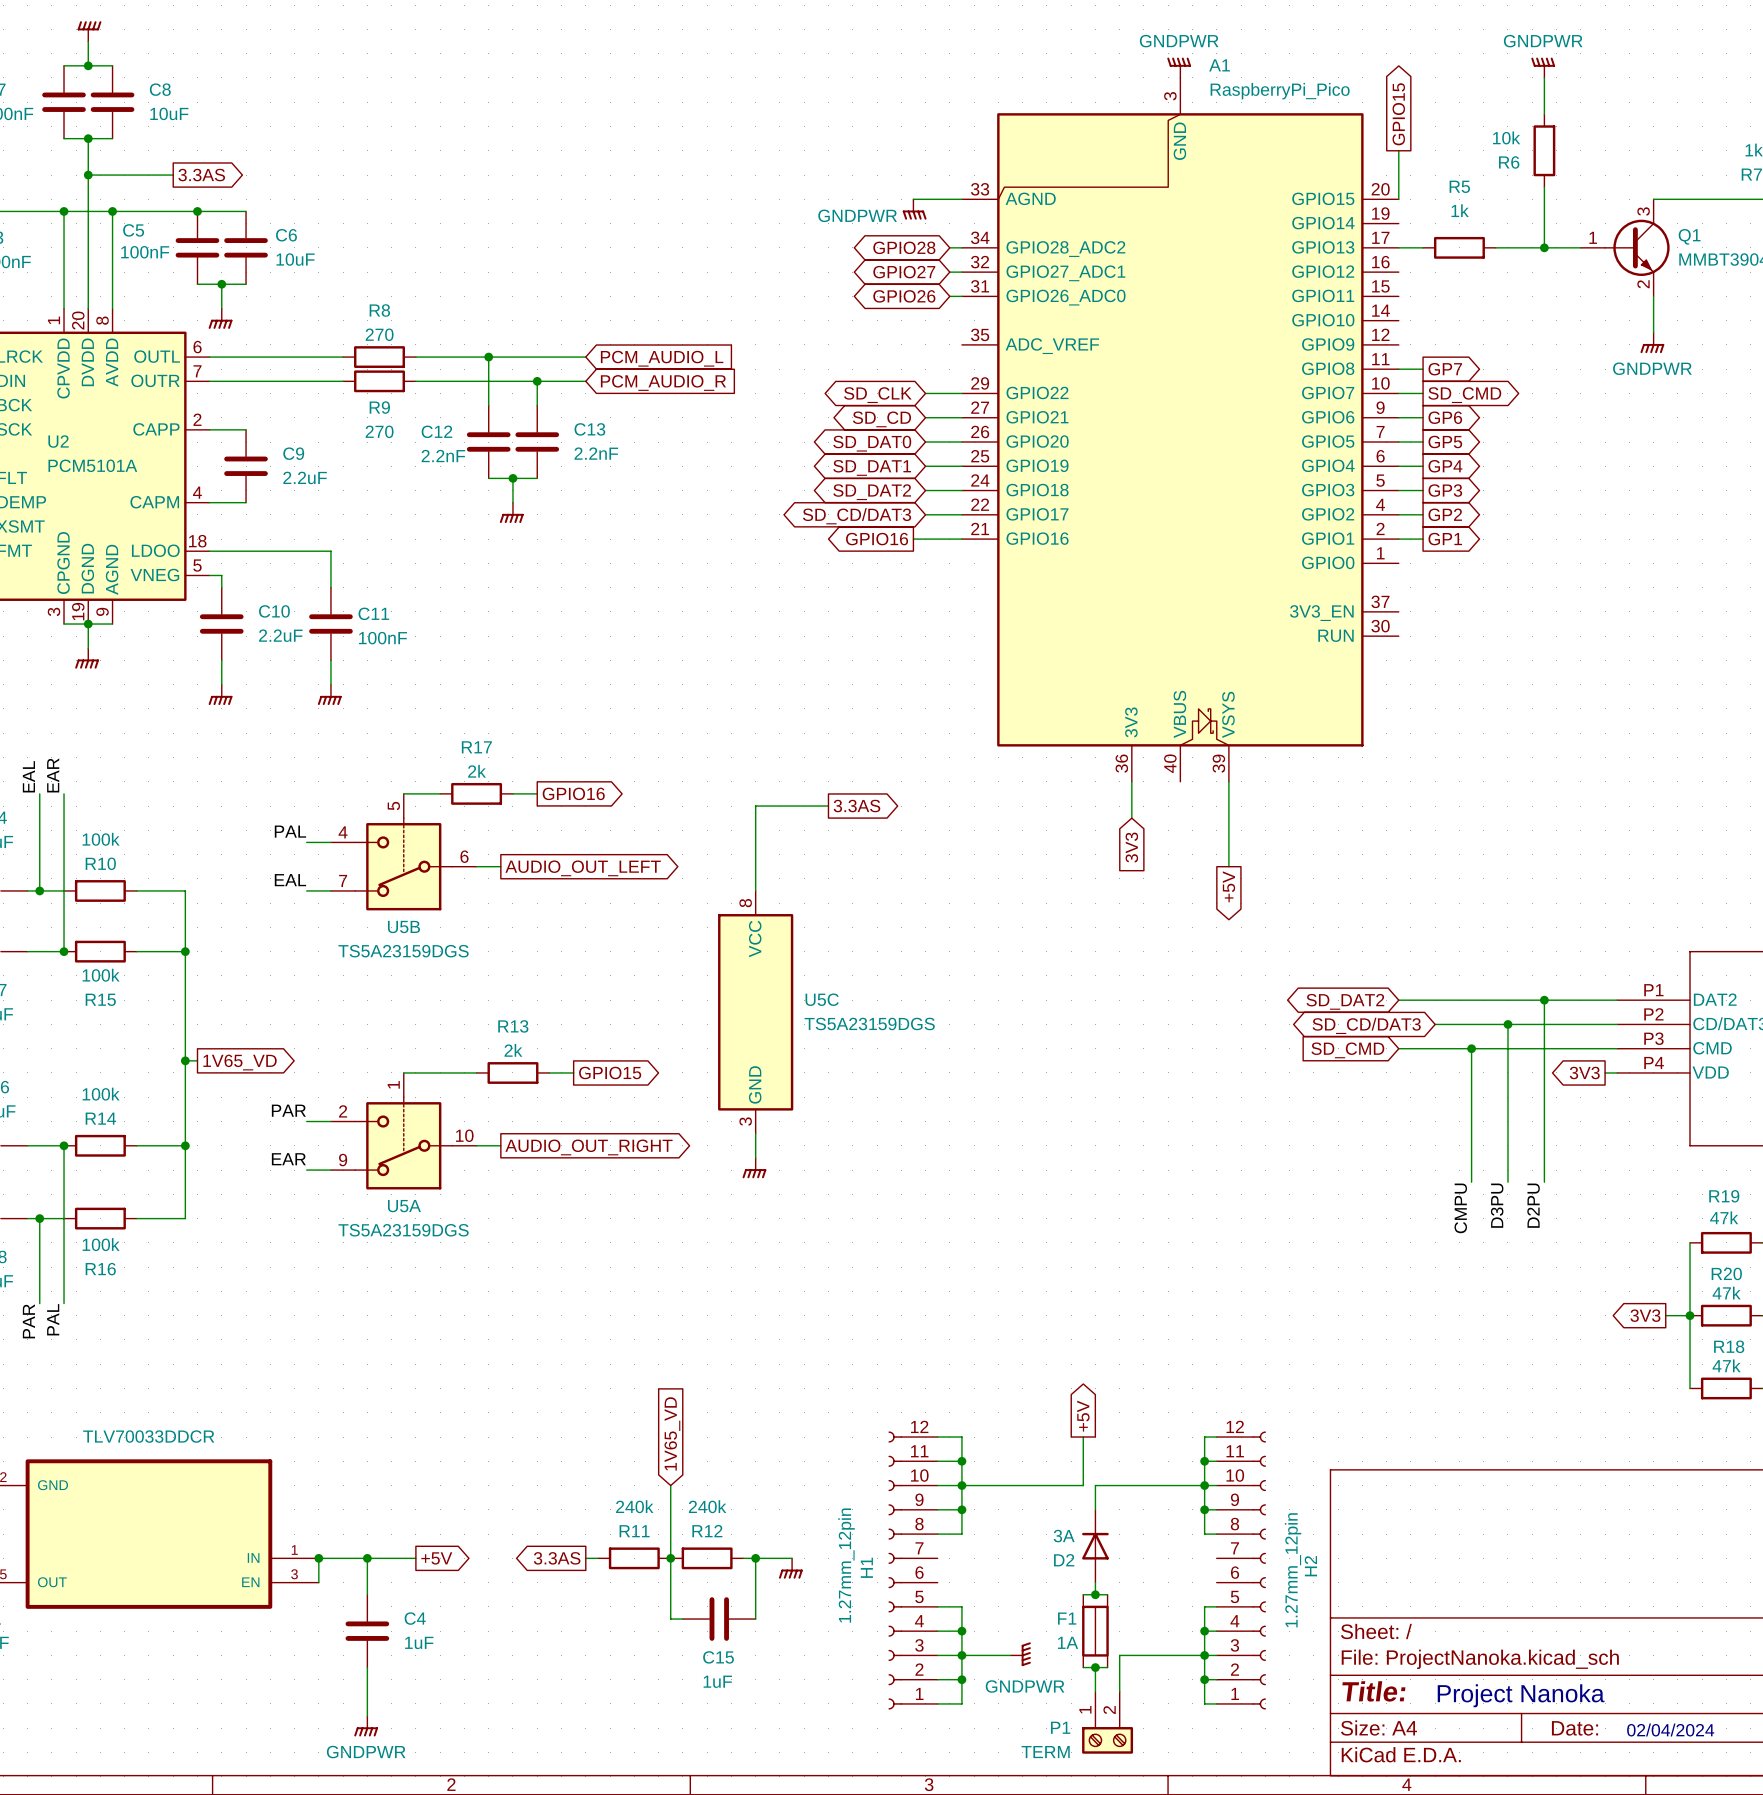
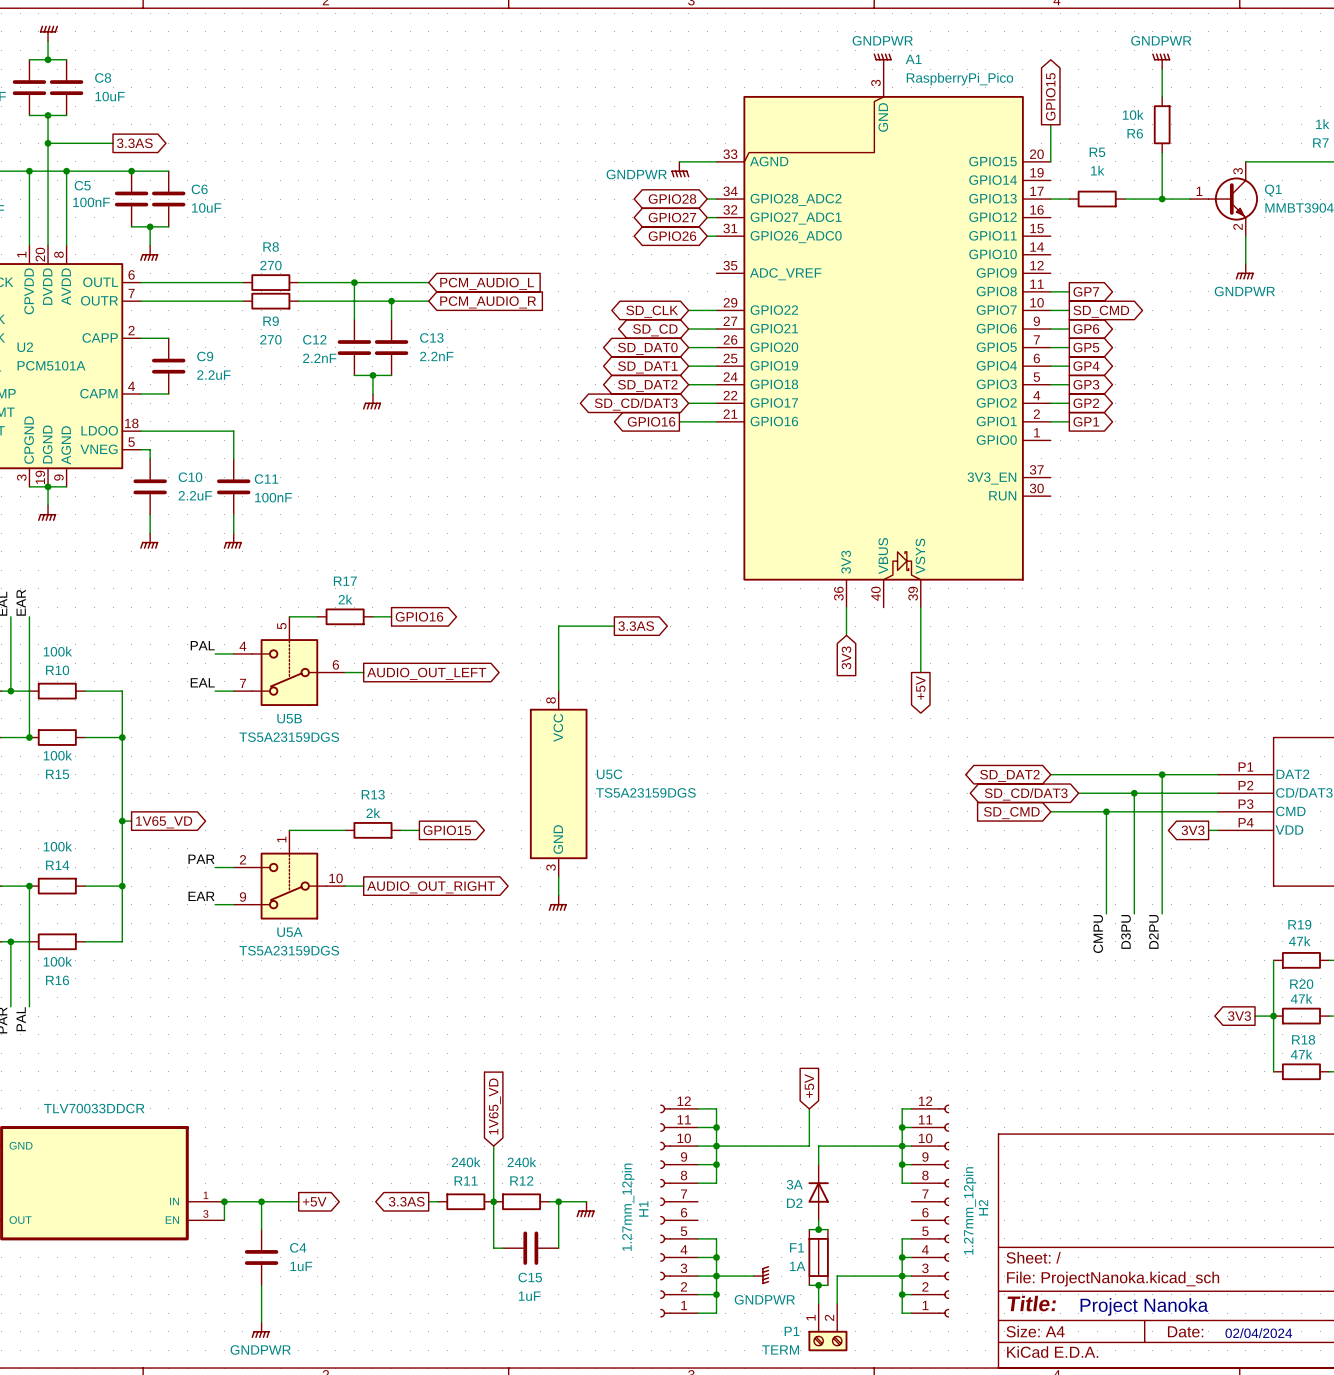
global label shape: output (1083, 1416) -> input (809, 1085)

